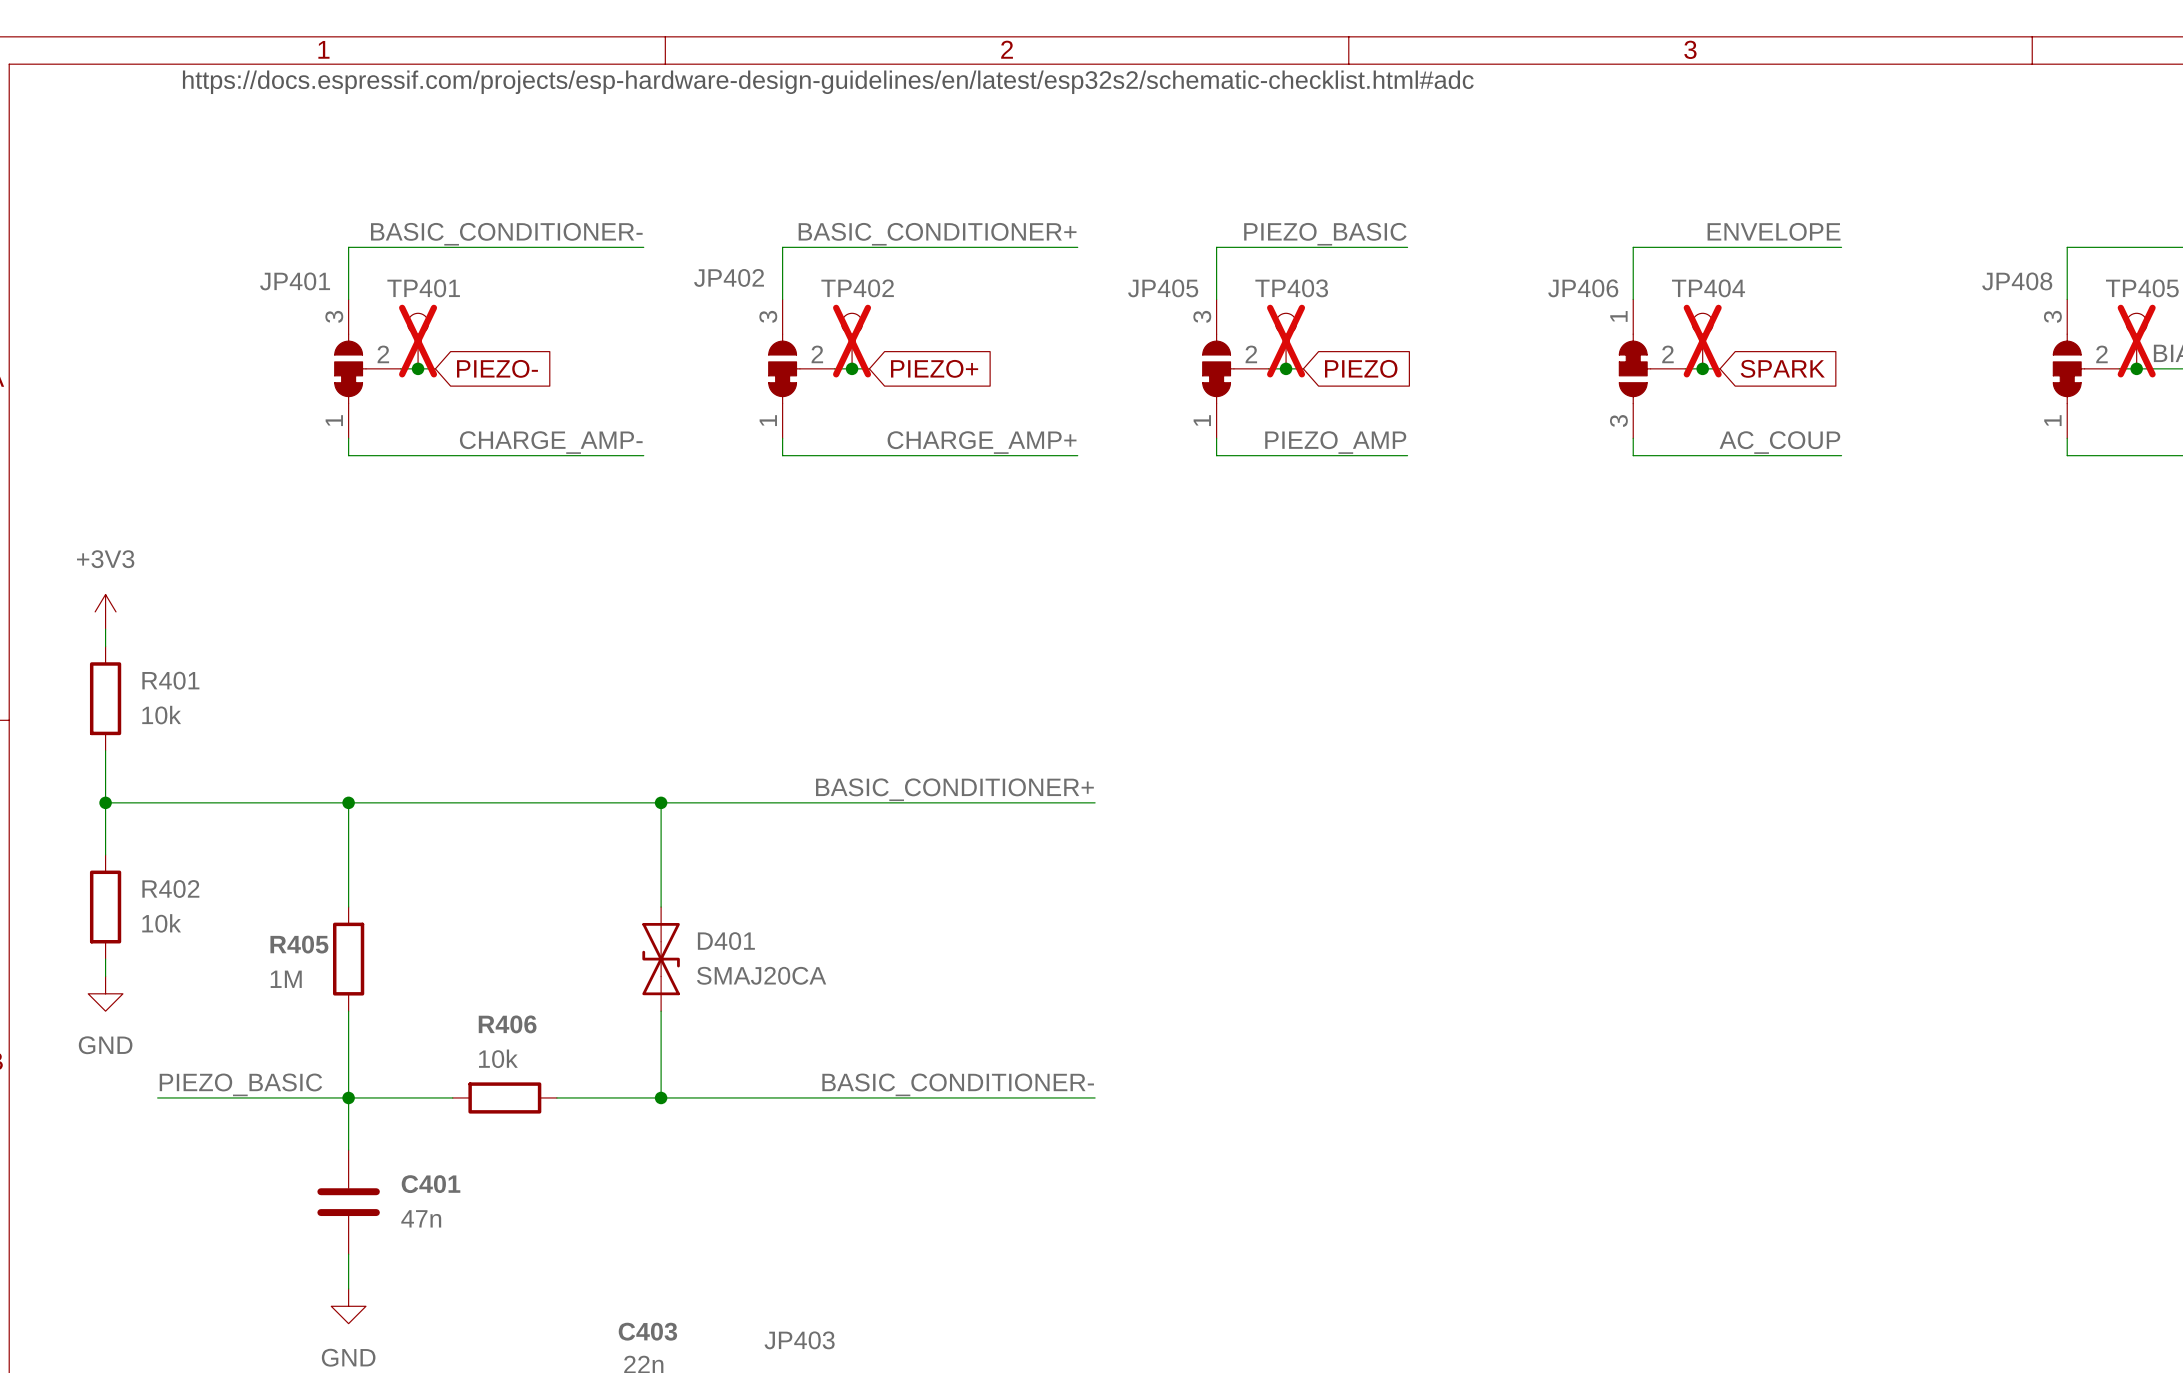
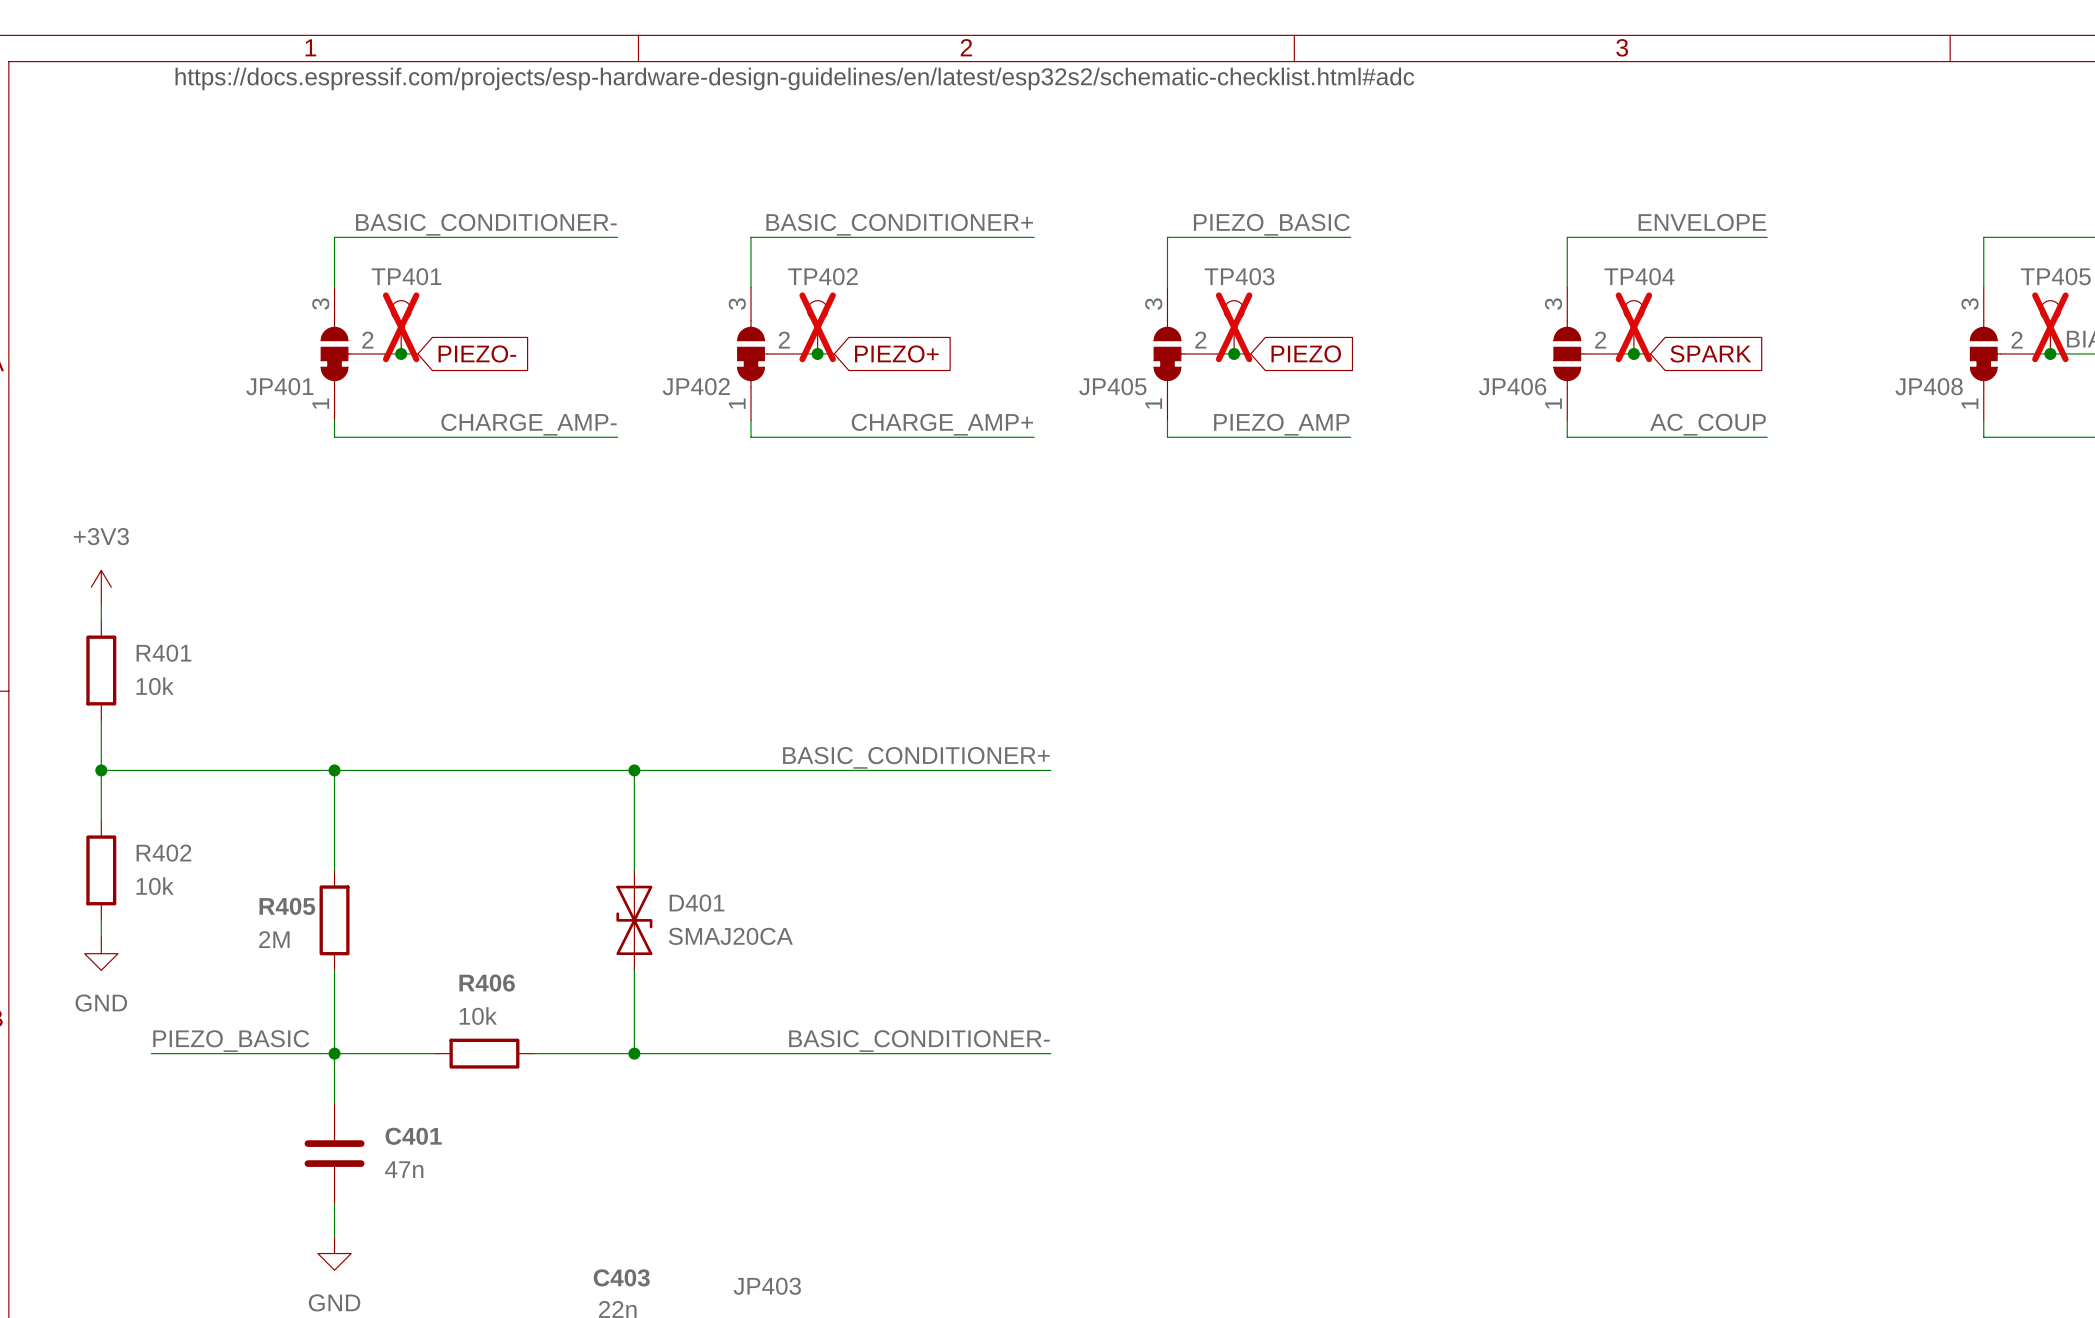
JP402 name position: JP402 (729, 277) -> JP402 (696, 386)
JP401 name position: JP401 (295, 281) -> JP401 (279, 386)
JP408 name position: JP408 (2017, 281) -> JP408 (1929, 386)
JP405 name position: JP405 (1163, 288) -> JP405 (1112, 386)
JP406 name position: JP406 (1583, 288) -> JP406 (1512, 386)
JP406 symbol: [1619, 299, 1686, 439] -> [1553, 287, 1618, 421]
R405 value: 1M (286, 979) -> 2M (274, 939)

